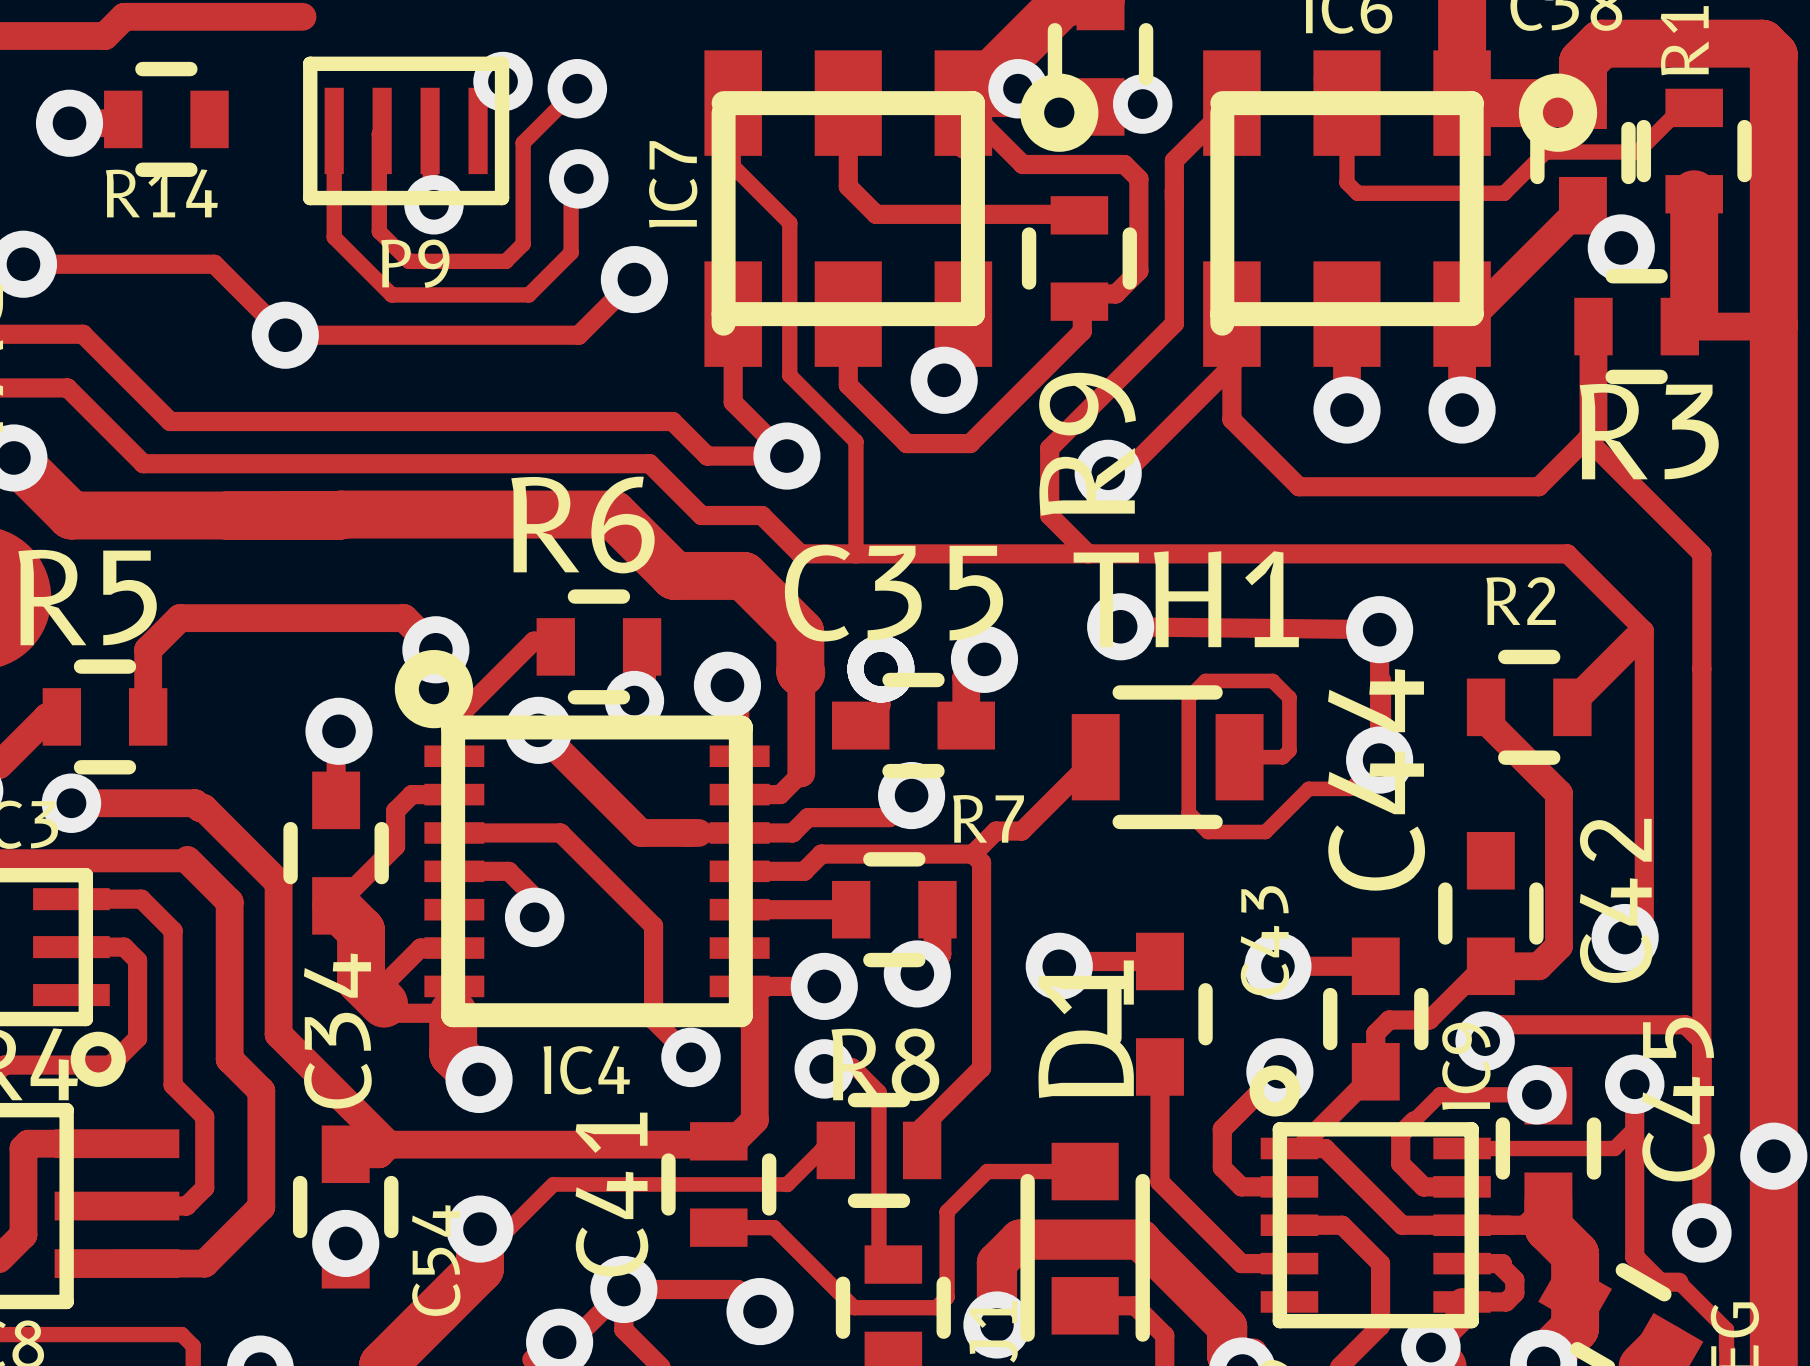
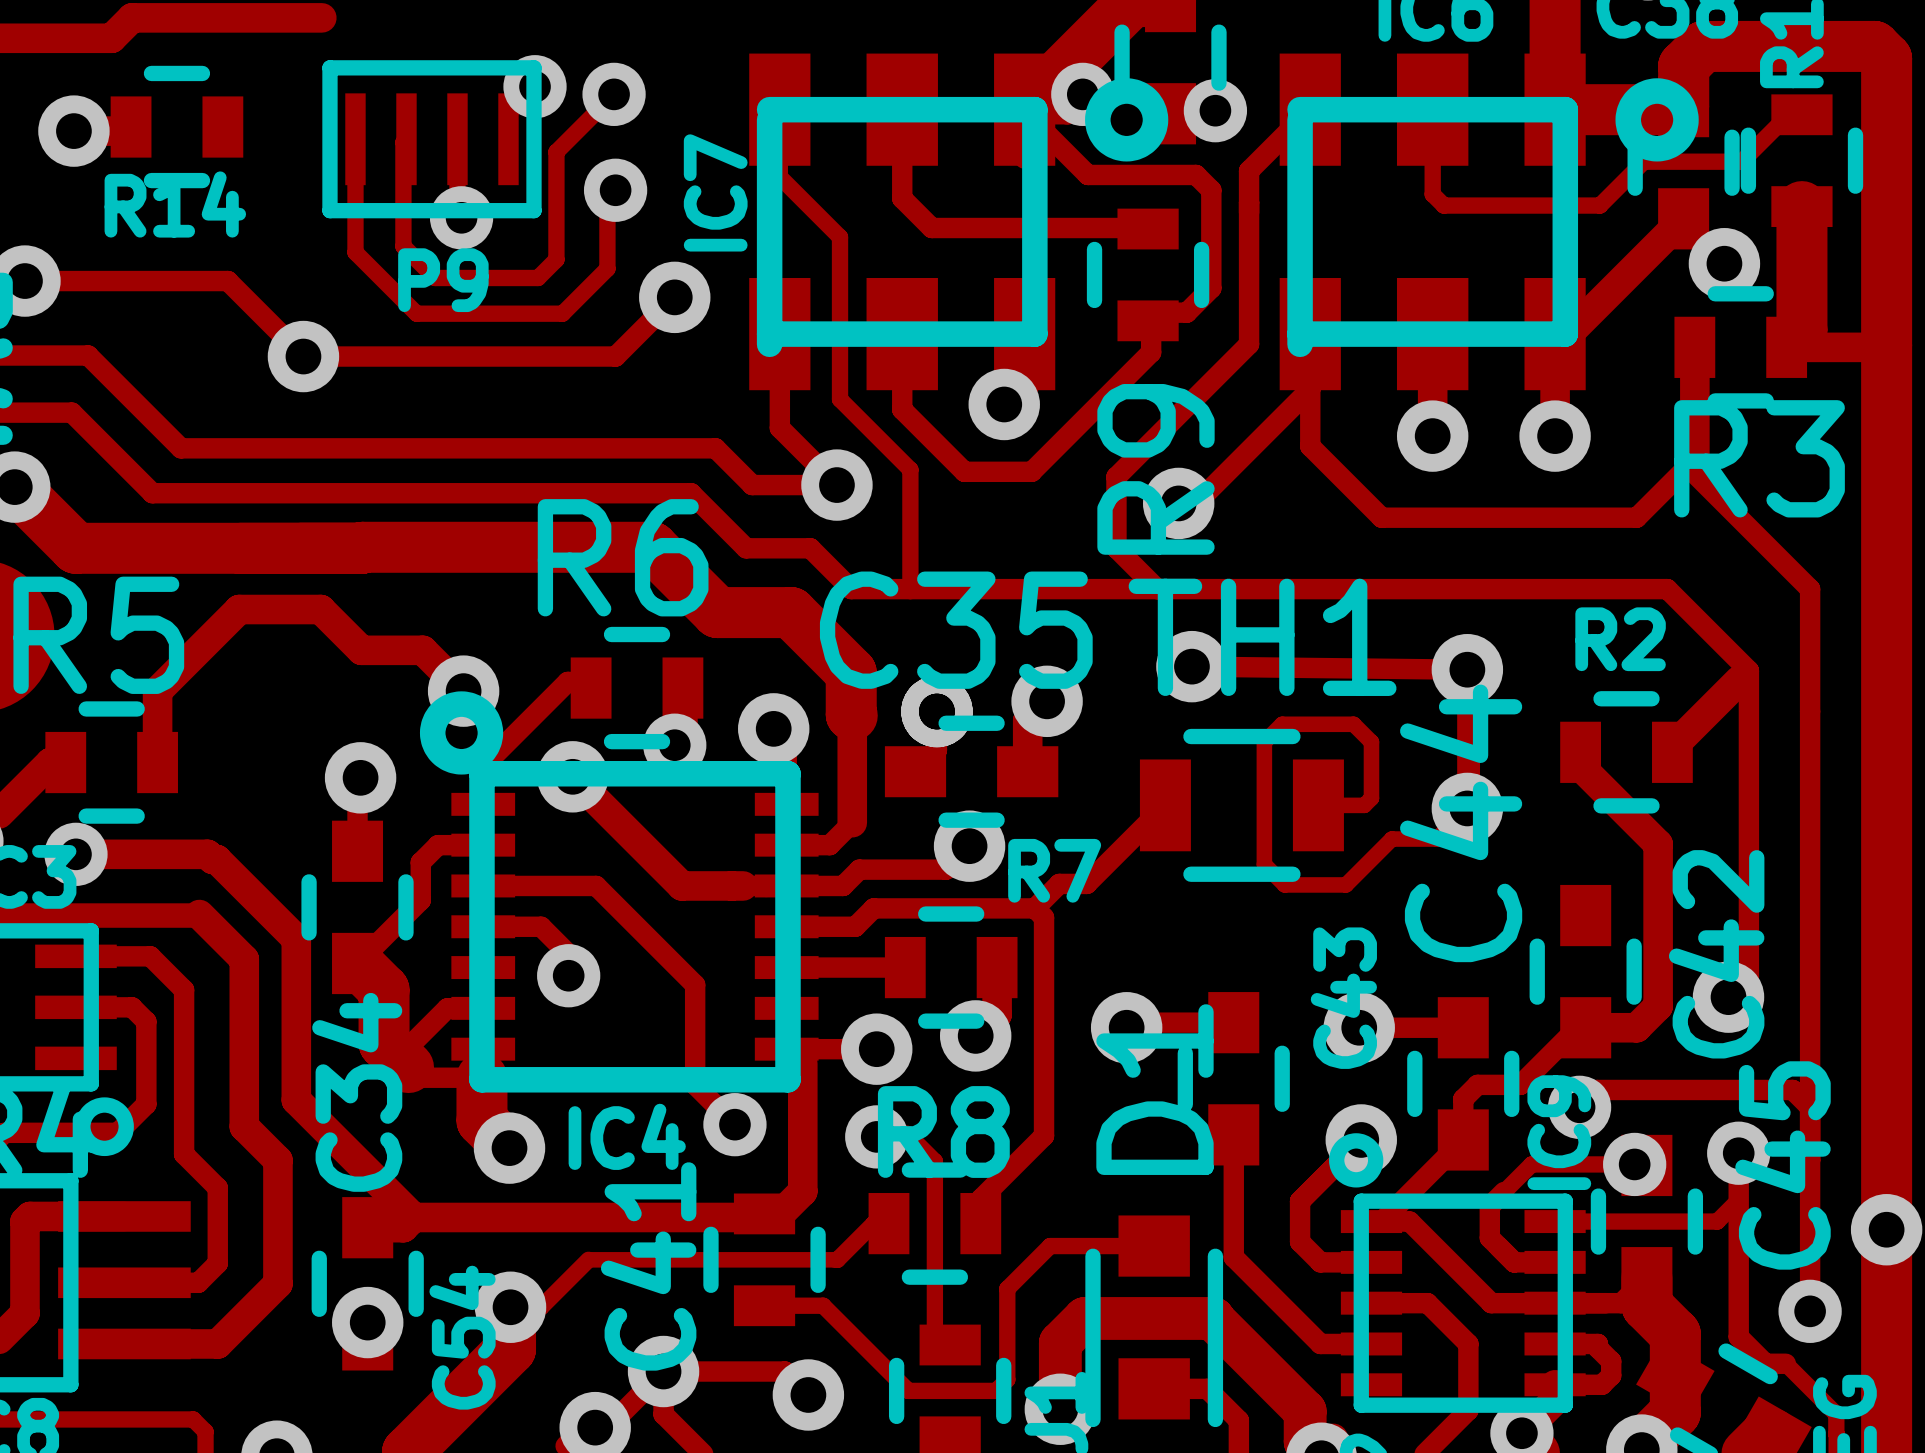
track: (179, 618) (404, 618) -> (191, 657) (239, 609) (320, 609) (361, 650) (422, 650) (429, 657)

